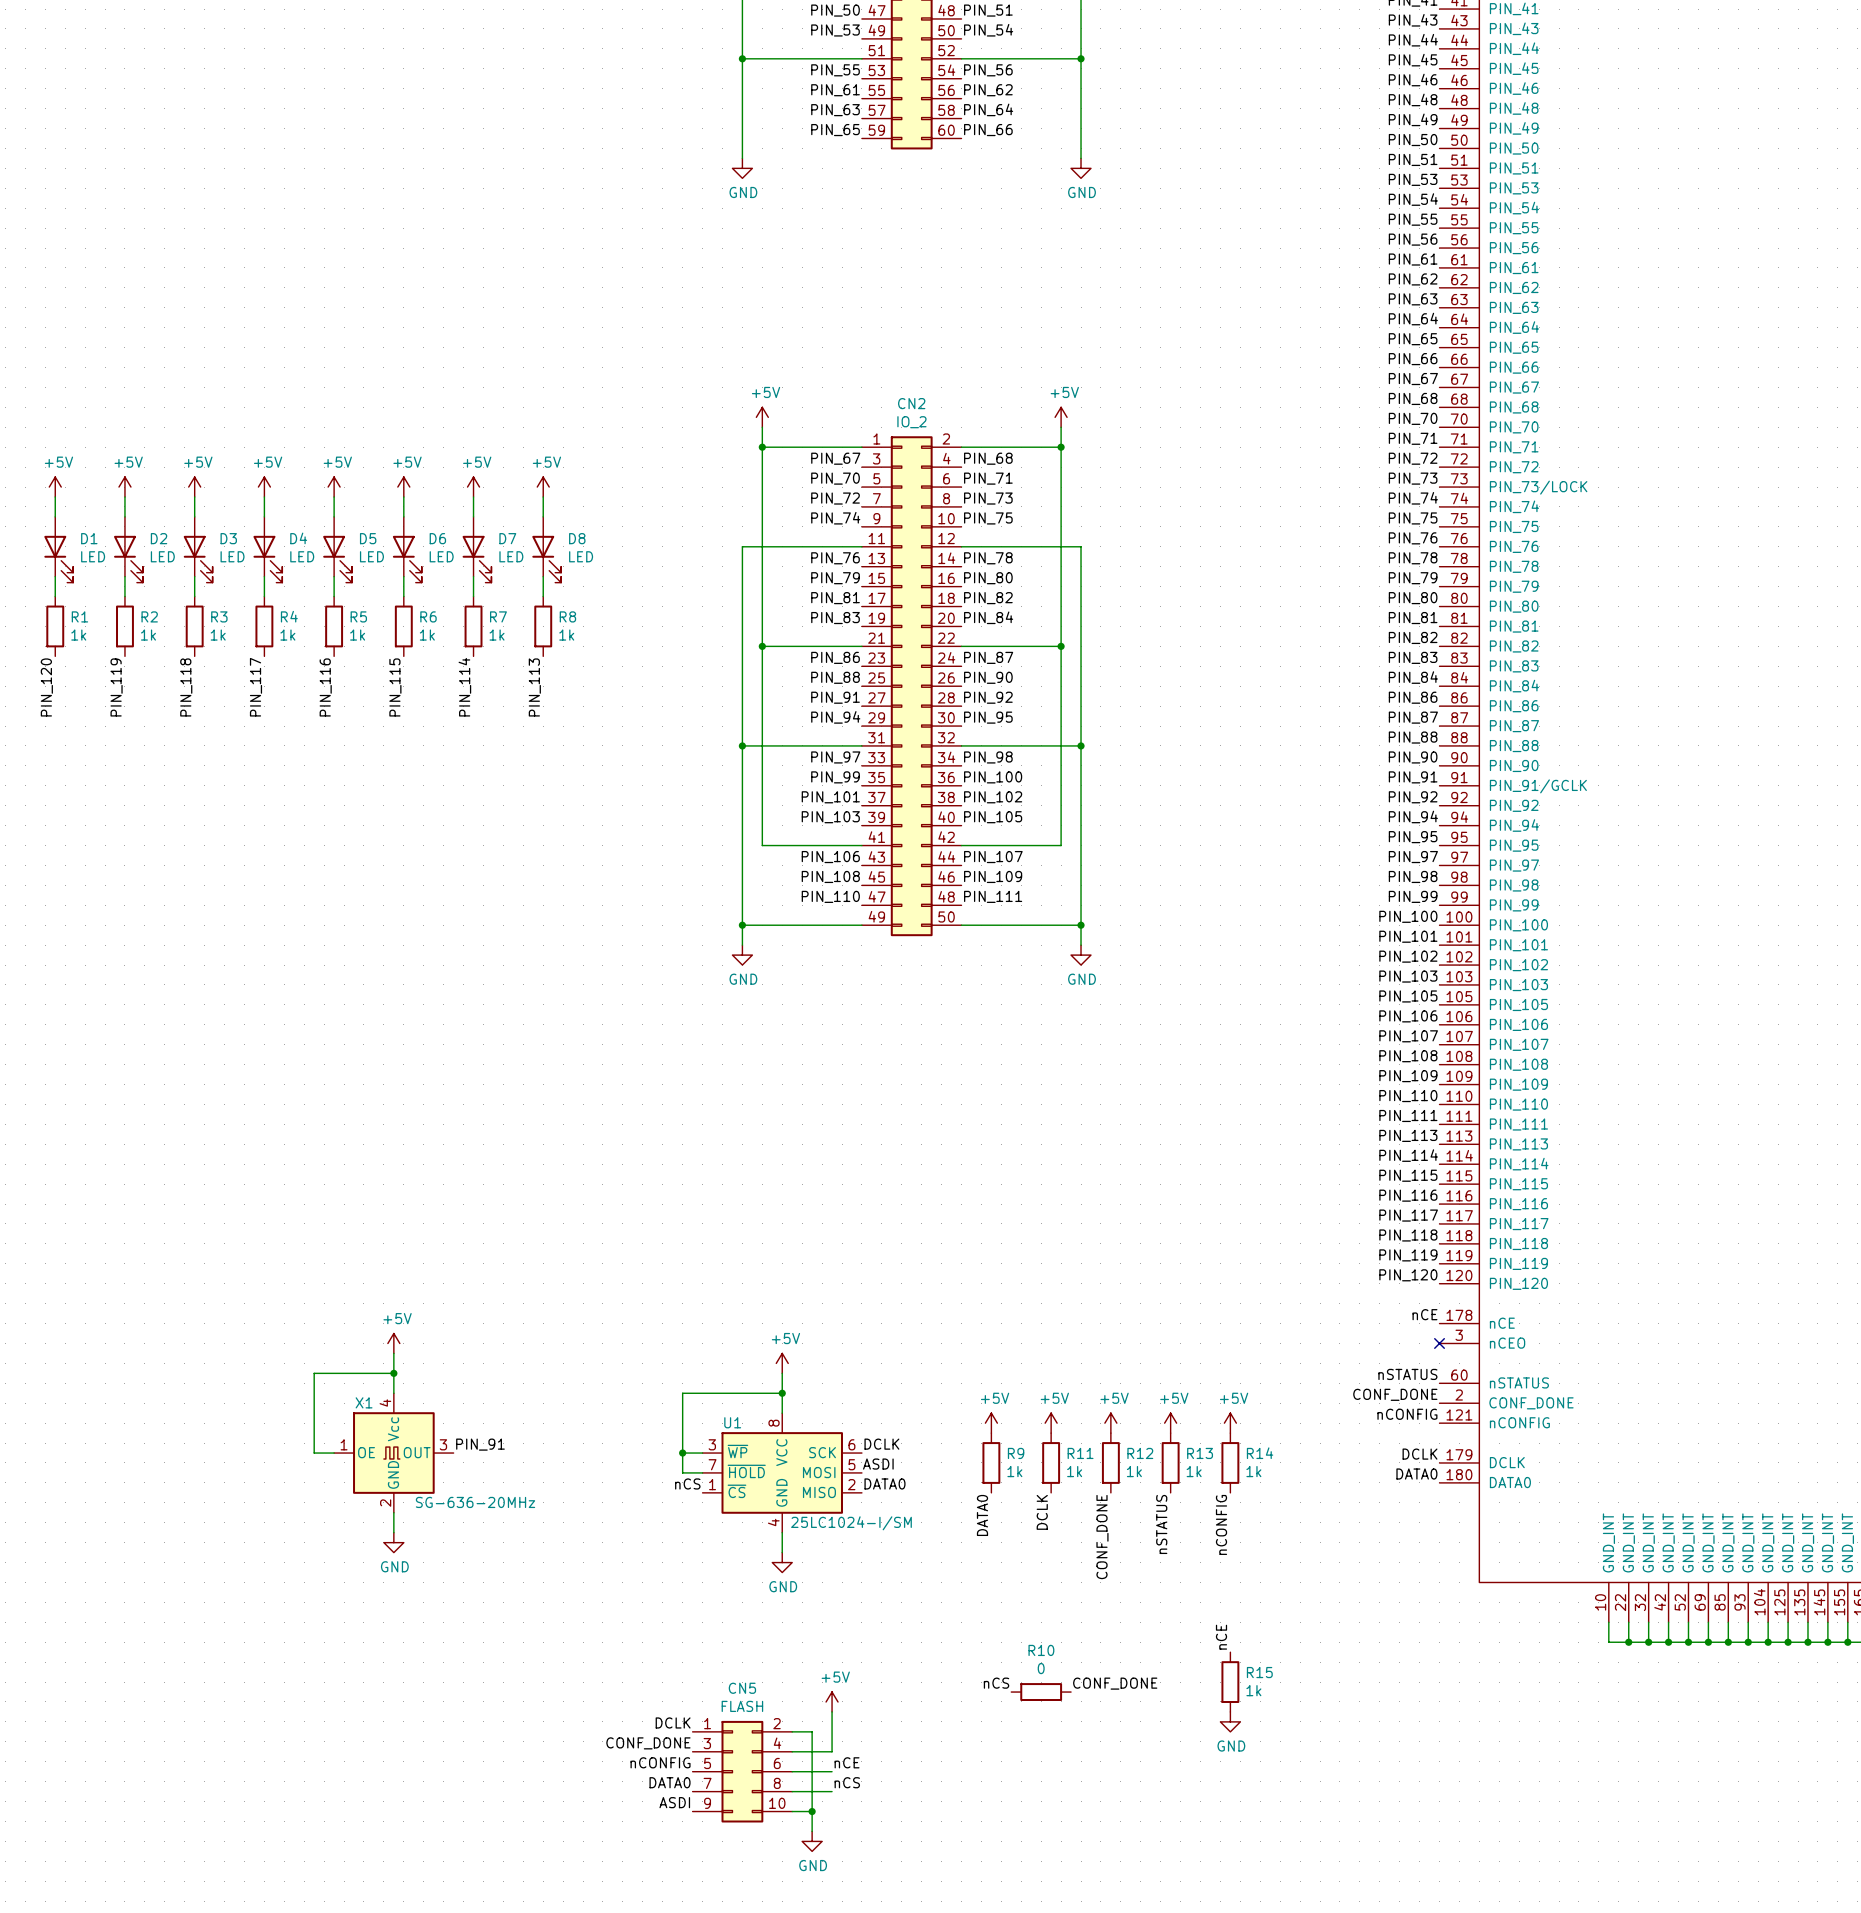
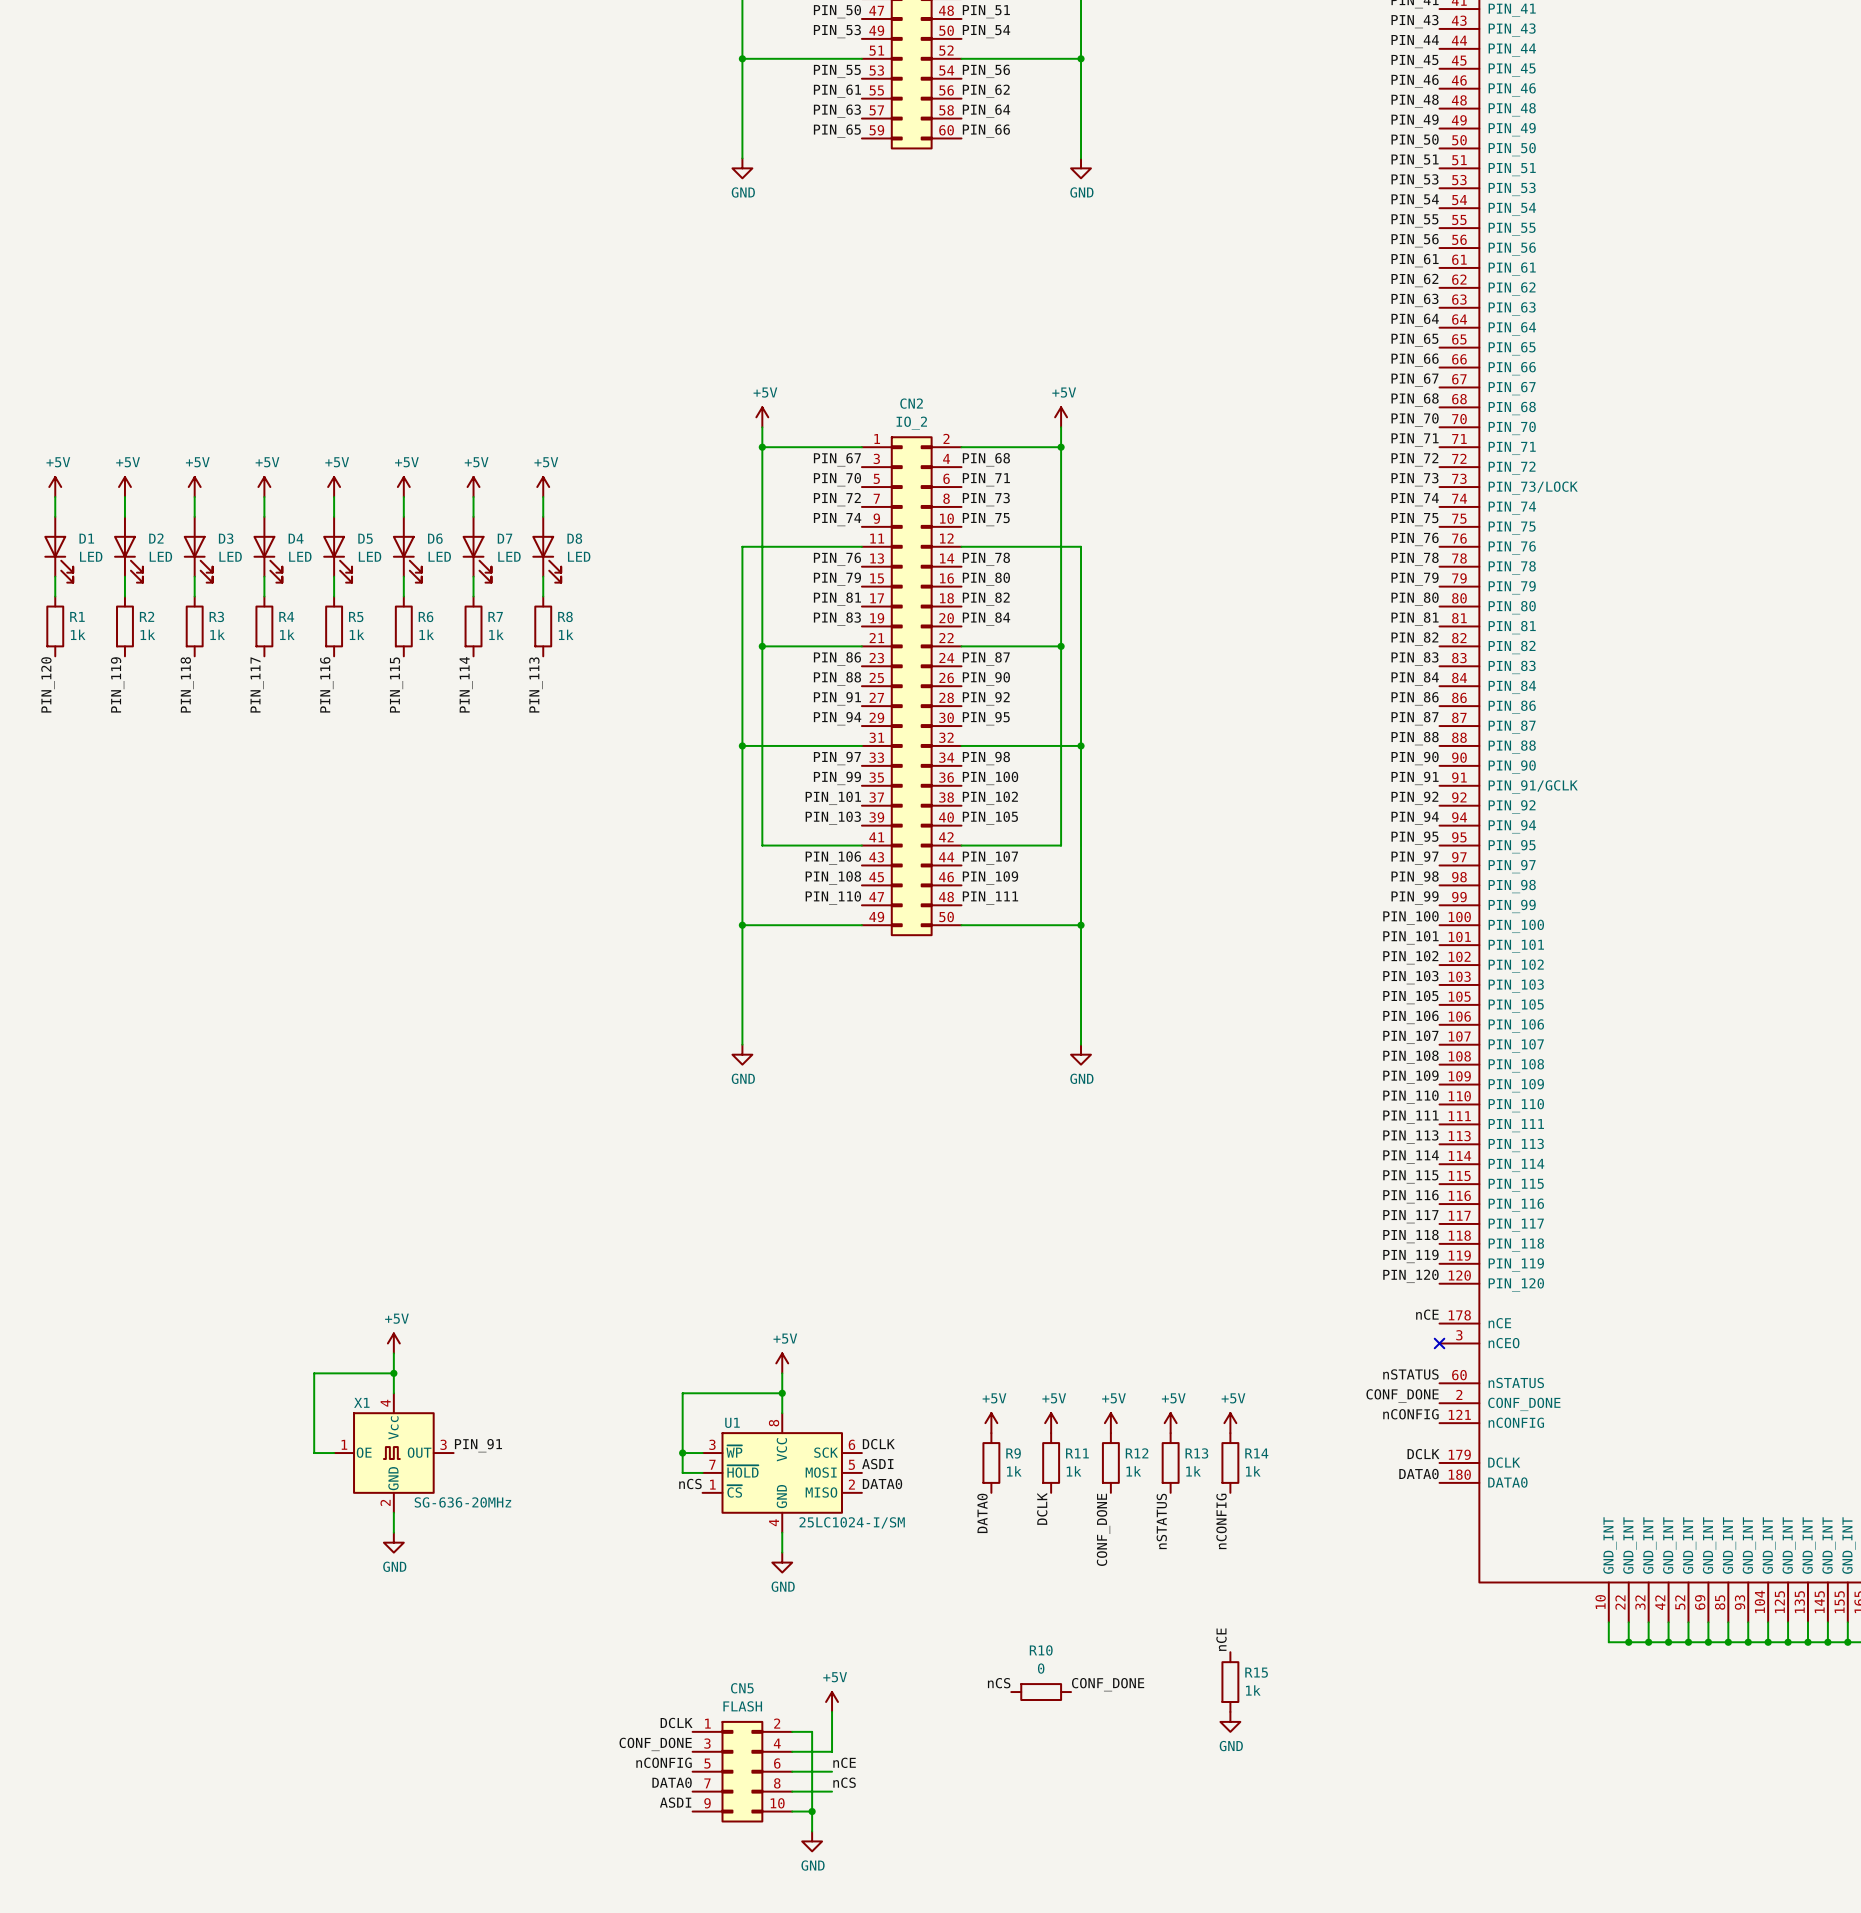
wire: none -> (742, 945) (742, 1044)
wire: none -> (1081, 945) (1081, 1044)
power symbol position: GND (742, 955) -> GND (742, 1054)
power symbol position: GND (1081, 955) -> GND (1081, 1054)

